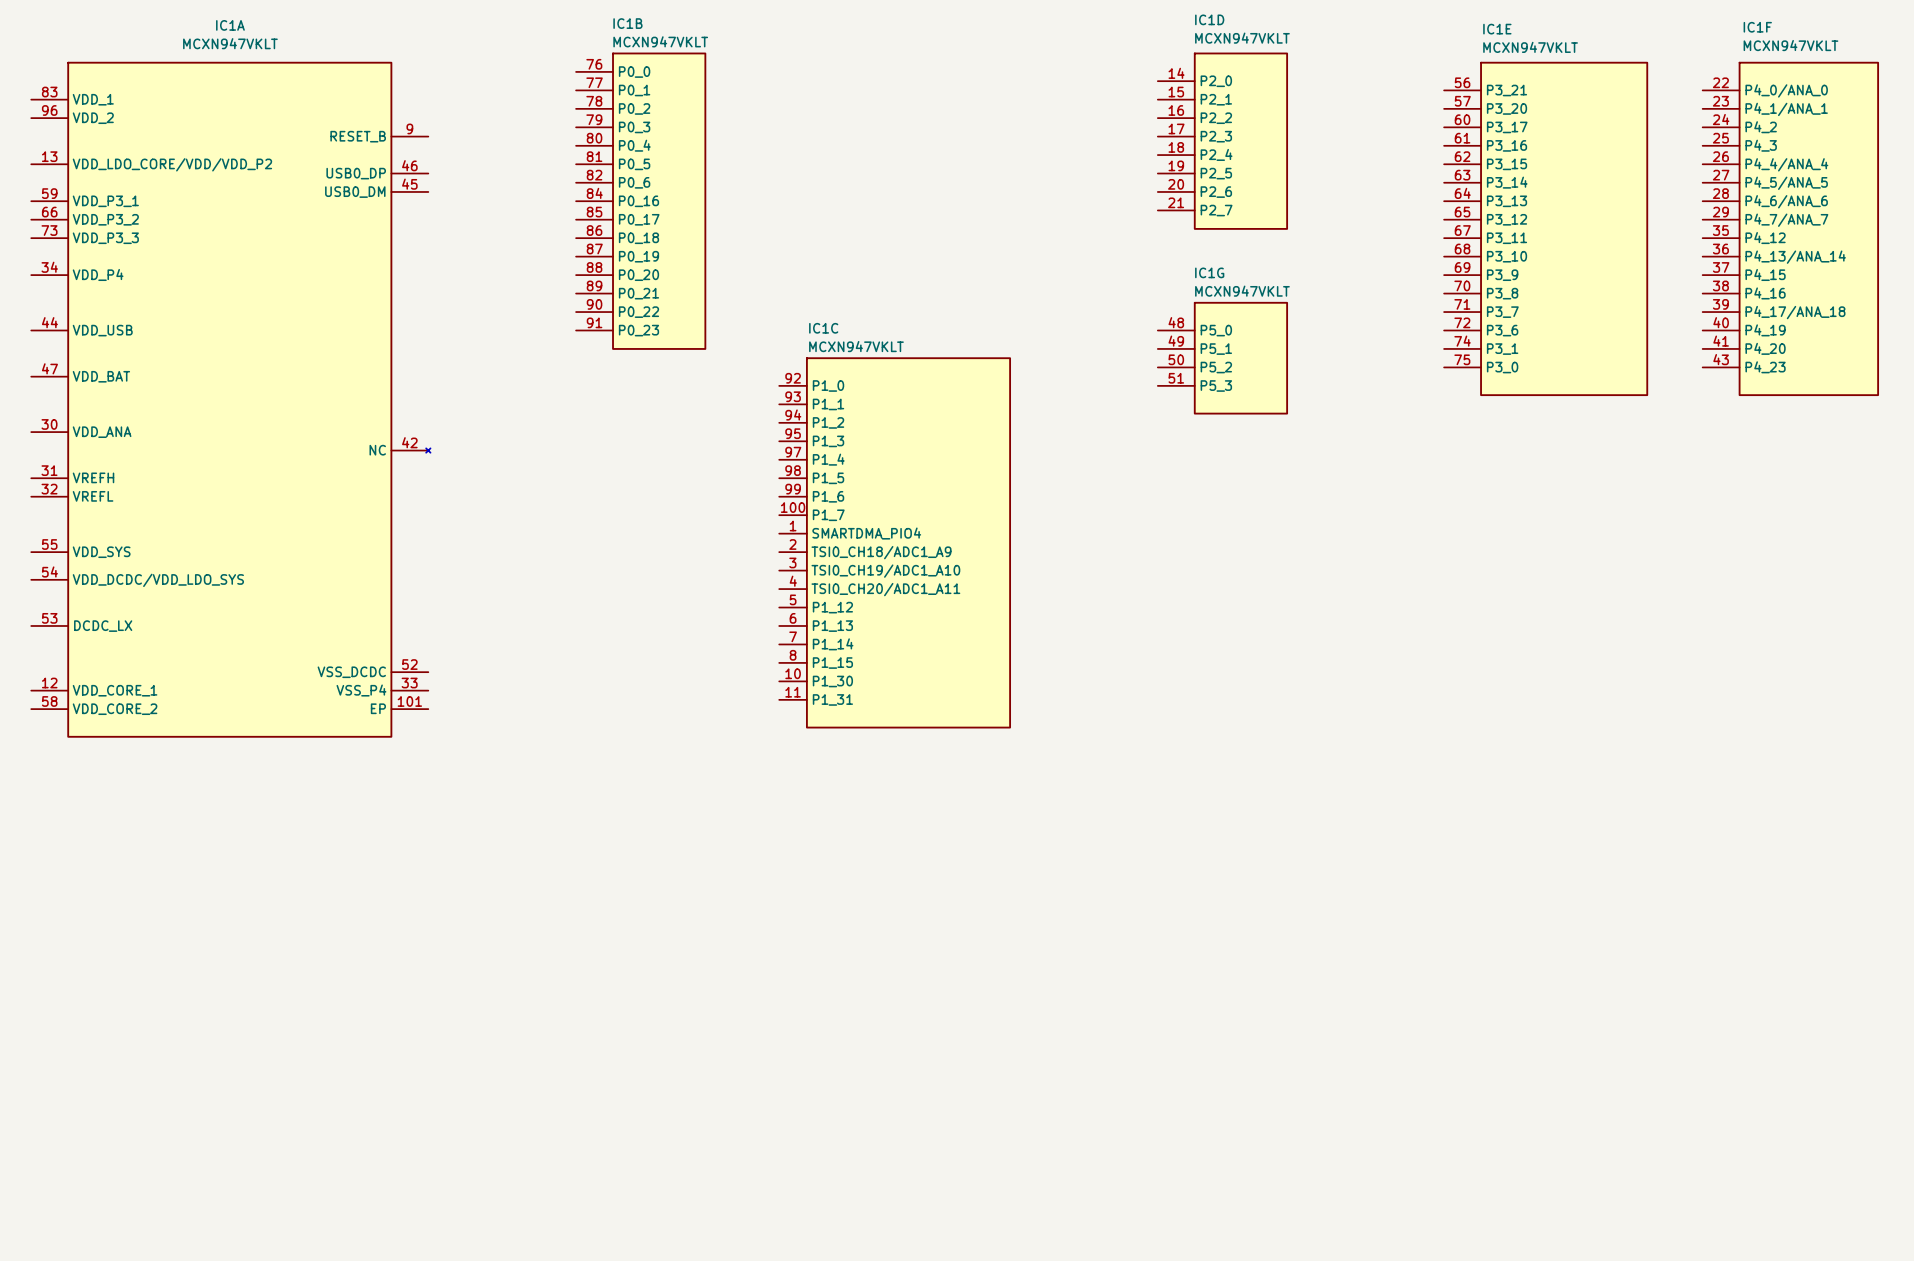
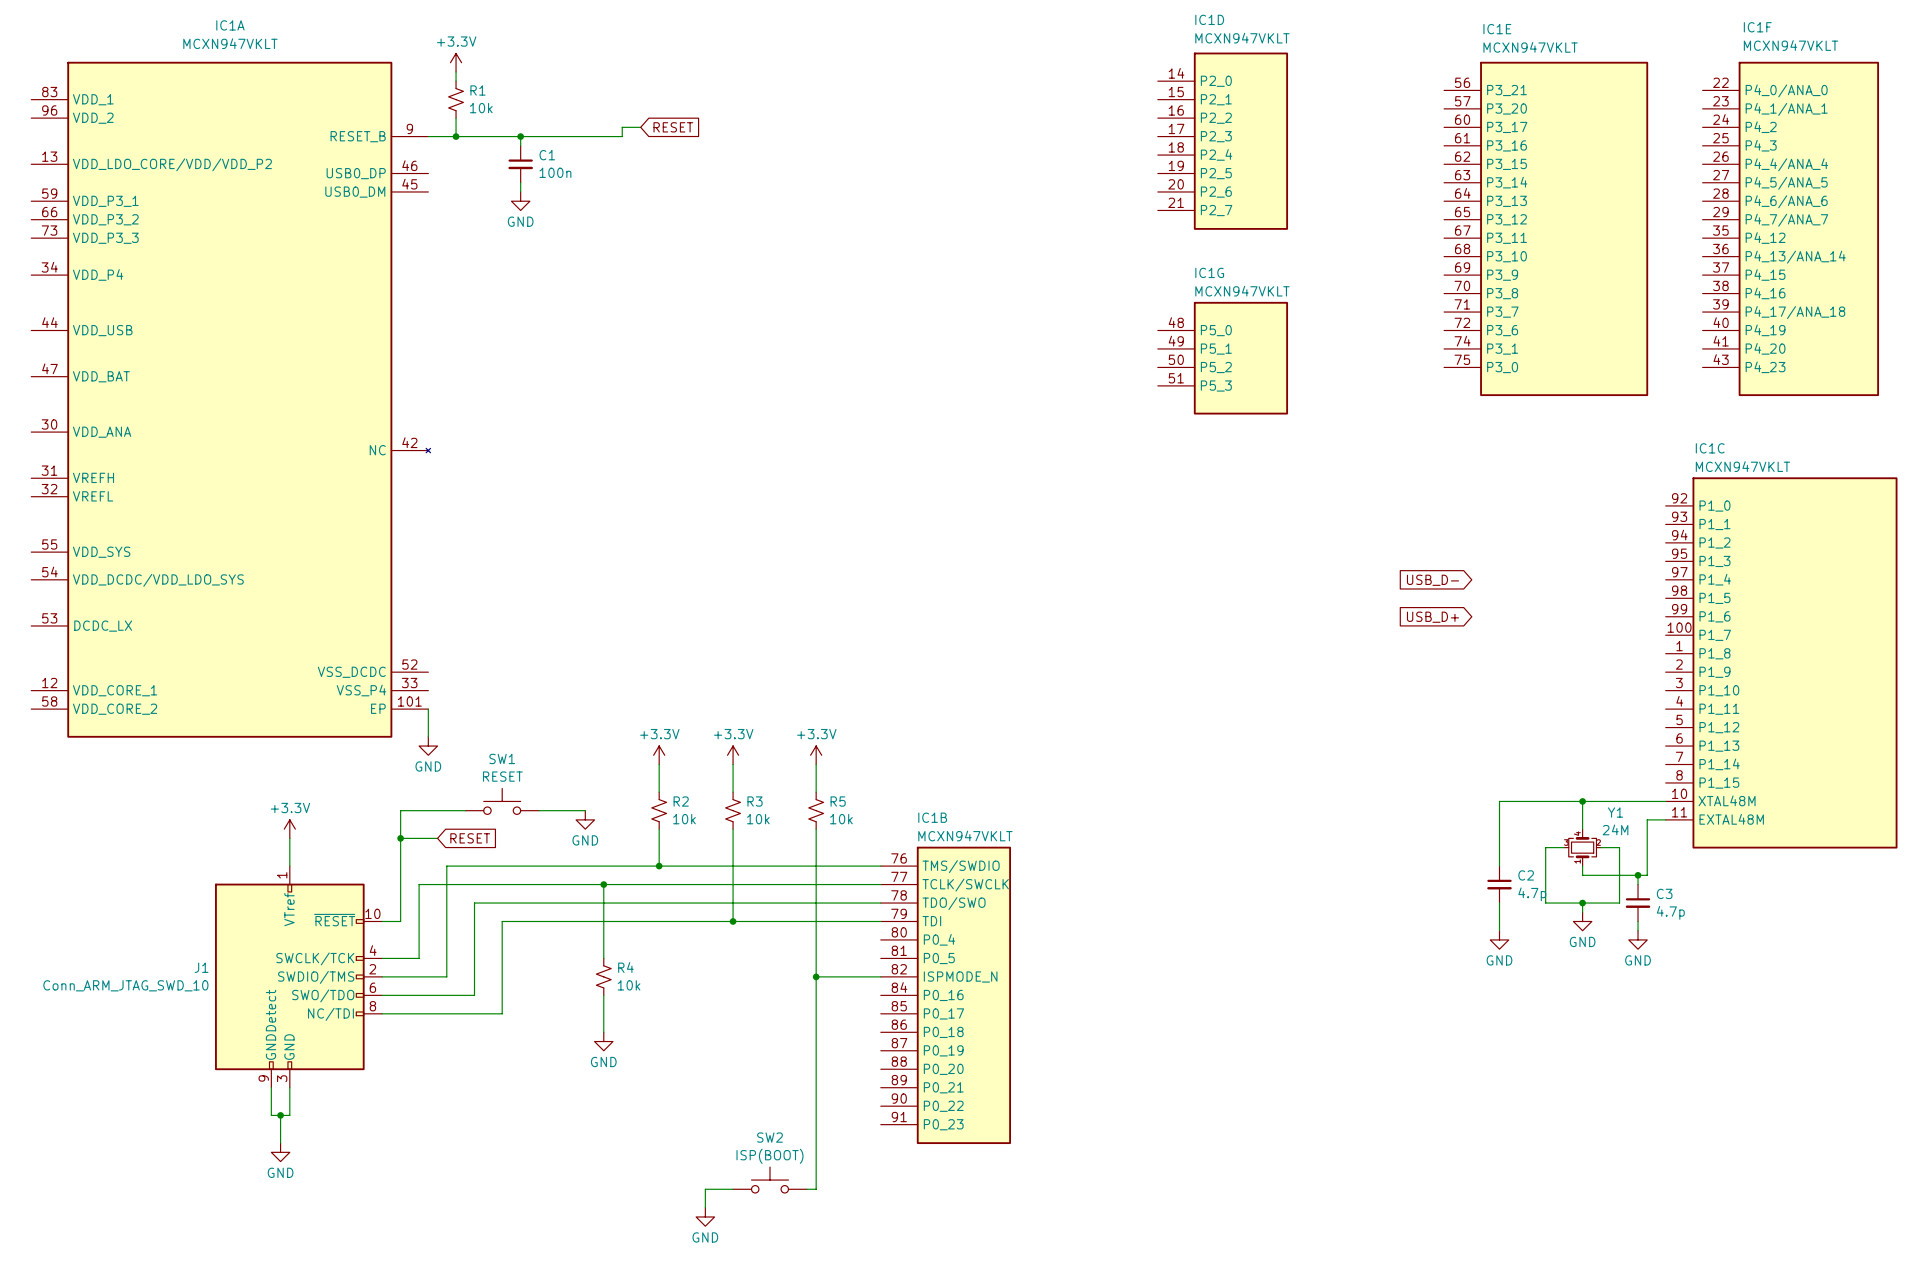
power symbol: none -> +3.3V (456, 62)
wire: none -> (456, 71) (456, 81)
IC1B pin name: P0_0 (634, 72) -> TMS/SWDIO (961, 866)
IC1B pin name: P0_1 (634, 90) -> TCLK/SWCLK (965, 885)
R1: none -> 10k (456, 99)
IC1B pin name: P0_2 (634, 108) -> TDO/SWO (954, 903)
wire: none -> (456, 118) (456, 136)
IC1B pin name: P0_3 (634, 127) -> TDI (931, 921)
wire: none -> (640, 127) (622, 127) (622, 136) (428, 136)
global label: none -> RESET (673, 127)
junction: none -> (456, 136)
wire: none -> (520, 136) (520, 145)
junction: none -> (520, 136)
C1: none -> 100n (520, 164)
wire: none -> (520, 182) (520, 191)
IC1B pin name: P0_6 (634, 182) -> ISPMODE_N (960, 976)
power symbol: none -> GND (520, 201)
IC1B position: (641, 201) -> (945, 995)
IC1C pin name: SMARTDMA_PIO4 (866, 533) -> P1_8 (1714, 653)
IC1C position: (895, 542) -> (1781, 662)
IC1C pin name: TSI0_CH18/ADC1_A9 (881, 552) -> P1_9 (1714, 672)
IC1C pin name: TSI0_CH19/ADC1_A10 (885, 571) -> P1_10 (1719, 690)
global label: none -> USB_D- (1432, 580)
IC1C pin name: TSI0_CH20/ADC1_A11 (885, 589) -> P1_11 (1719, 709)
global label: none -> USB_D+ (1432, 617)
IC1C pin name: P1_30 (832, 681) -> XTAL48M (1727, 800)
IC1C pin name: P1_31 (832, 699) -> EXTAL48M (1731, 819)
wire: none -> (428, 709) (428, 736)
power symbol: none -> GND (428, 746)
power symbol: none -> +3.3V (659, 755)
power symbol: none -> +3.3V (733, 755)
power symbol: none -> +3.3V (816, 755)
wire: none -> (659, 764) (659, 792)
wire: none -> (733, 764) (733, 792)
wire: none -> (816, 764) (816, 792)
SW1: none -> RESET (502, 801)
wire: none -> (1582, 801) (1582, 829)
junction: none -> (1582, 801)
wire: none -> (1665, 801) (1499, 801) (1499, 866)
wire: none -> (465, 810) (400, 810) (400, 921) (382, 921)
wire: none -> (539, 810) (585, 810)
R2: none -> 10k (659, 810)
R3: none -> 10k (733, 810)
R5: none -> 10k (816, 810)
power symbol: none -> GND (585, 819)
wire: none -> (1665, 819) (1647, 819) (1647, 875) (1582, 875) (1582, 866)
power symbol: none -> +3.3V (289, 829)
wire: none -> (659, 829) (659, 866)
wire: none -> (733, 829) (733, 921)
wire: none -> (816, 829) (816, 1189) (806, 1189)
wire: none -> (289, 838) (289, 866)
wire: none -> (400, 838) (437, 838)
junction: none -> (400, 838)
global label: none -> RESET (470, 838)
wire: none -> (1564, 847) (1545, 847) (1545, 903) (1619, 903) (1619, 847) (1601, 847)
Y1: none -> 24M (1582, 847)
junction: none -> (659, 866)
wire: none -> (880, 866) (446, 866) (446, 976) (382, 976)
wire: none -> (1638, 875) (1638, 884)
junction: none -> (1638, 875)
wire: none -> (603, 884) (603, 958)
junction: none -> (603, 884)
wire: none -> (880, 884) (419, 884) (419, 958) (382, 958)
C2: none -> 4.7p (1499, 884)
wire: none -> (880, 903) (474, 903) (474, 995) (382, 995)
wire: none -> (1499, 903) (1499, 930)
wire: none -> (1582, 903) (1582, 912)
junction: none -> (1582, 903)
C3: none -> 4.7p (1638, 903)
junction: none -> (733, 921)
wire: none -> (880, 921) (502, 921) (502, 1013) (382, 1013)
power symbol: none -> GND (1582, 921)
wire: none -> (1638, 921) (1638, 930)
power symbol: none -> GND (1499, 939)
power symbol: none -> GND (1638, 939)
J1: none -> Conn_ARM_JTAG_SWD_10 (298, 976)
R4: none -> 10k (603, 976)
wire: none -> (816, 976) (880, 976)
junction: none -> (816, 976)
wire: none -> (603, 995) (603, 1032)
power symbol: none -> GND (603, 1041)
wire: none -> (271, 1087) (271, 1115) (289, 1115) (289, 1087)
wire: none -> (280, 1115) (280, 1143)
junction: none -> (280, 1115)
power symbol: none -> GND (280, 1152)
SW2: none -> ISP(BOOT) (769, 1180)
wire: none -> (733, 1189) (705, 1189) (705, 1207)
power symbol: none -> GND (705, 1216)

